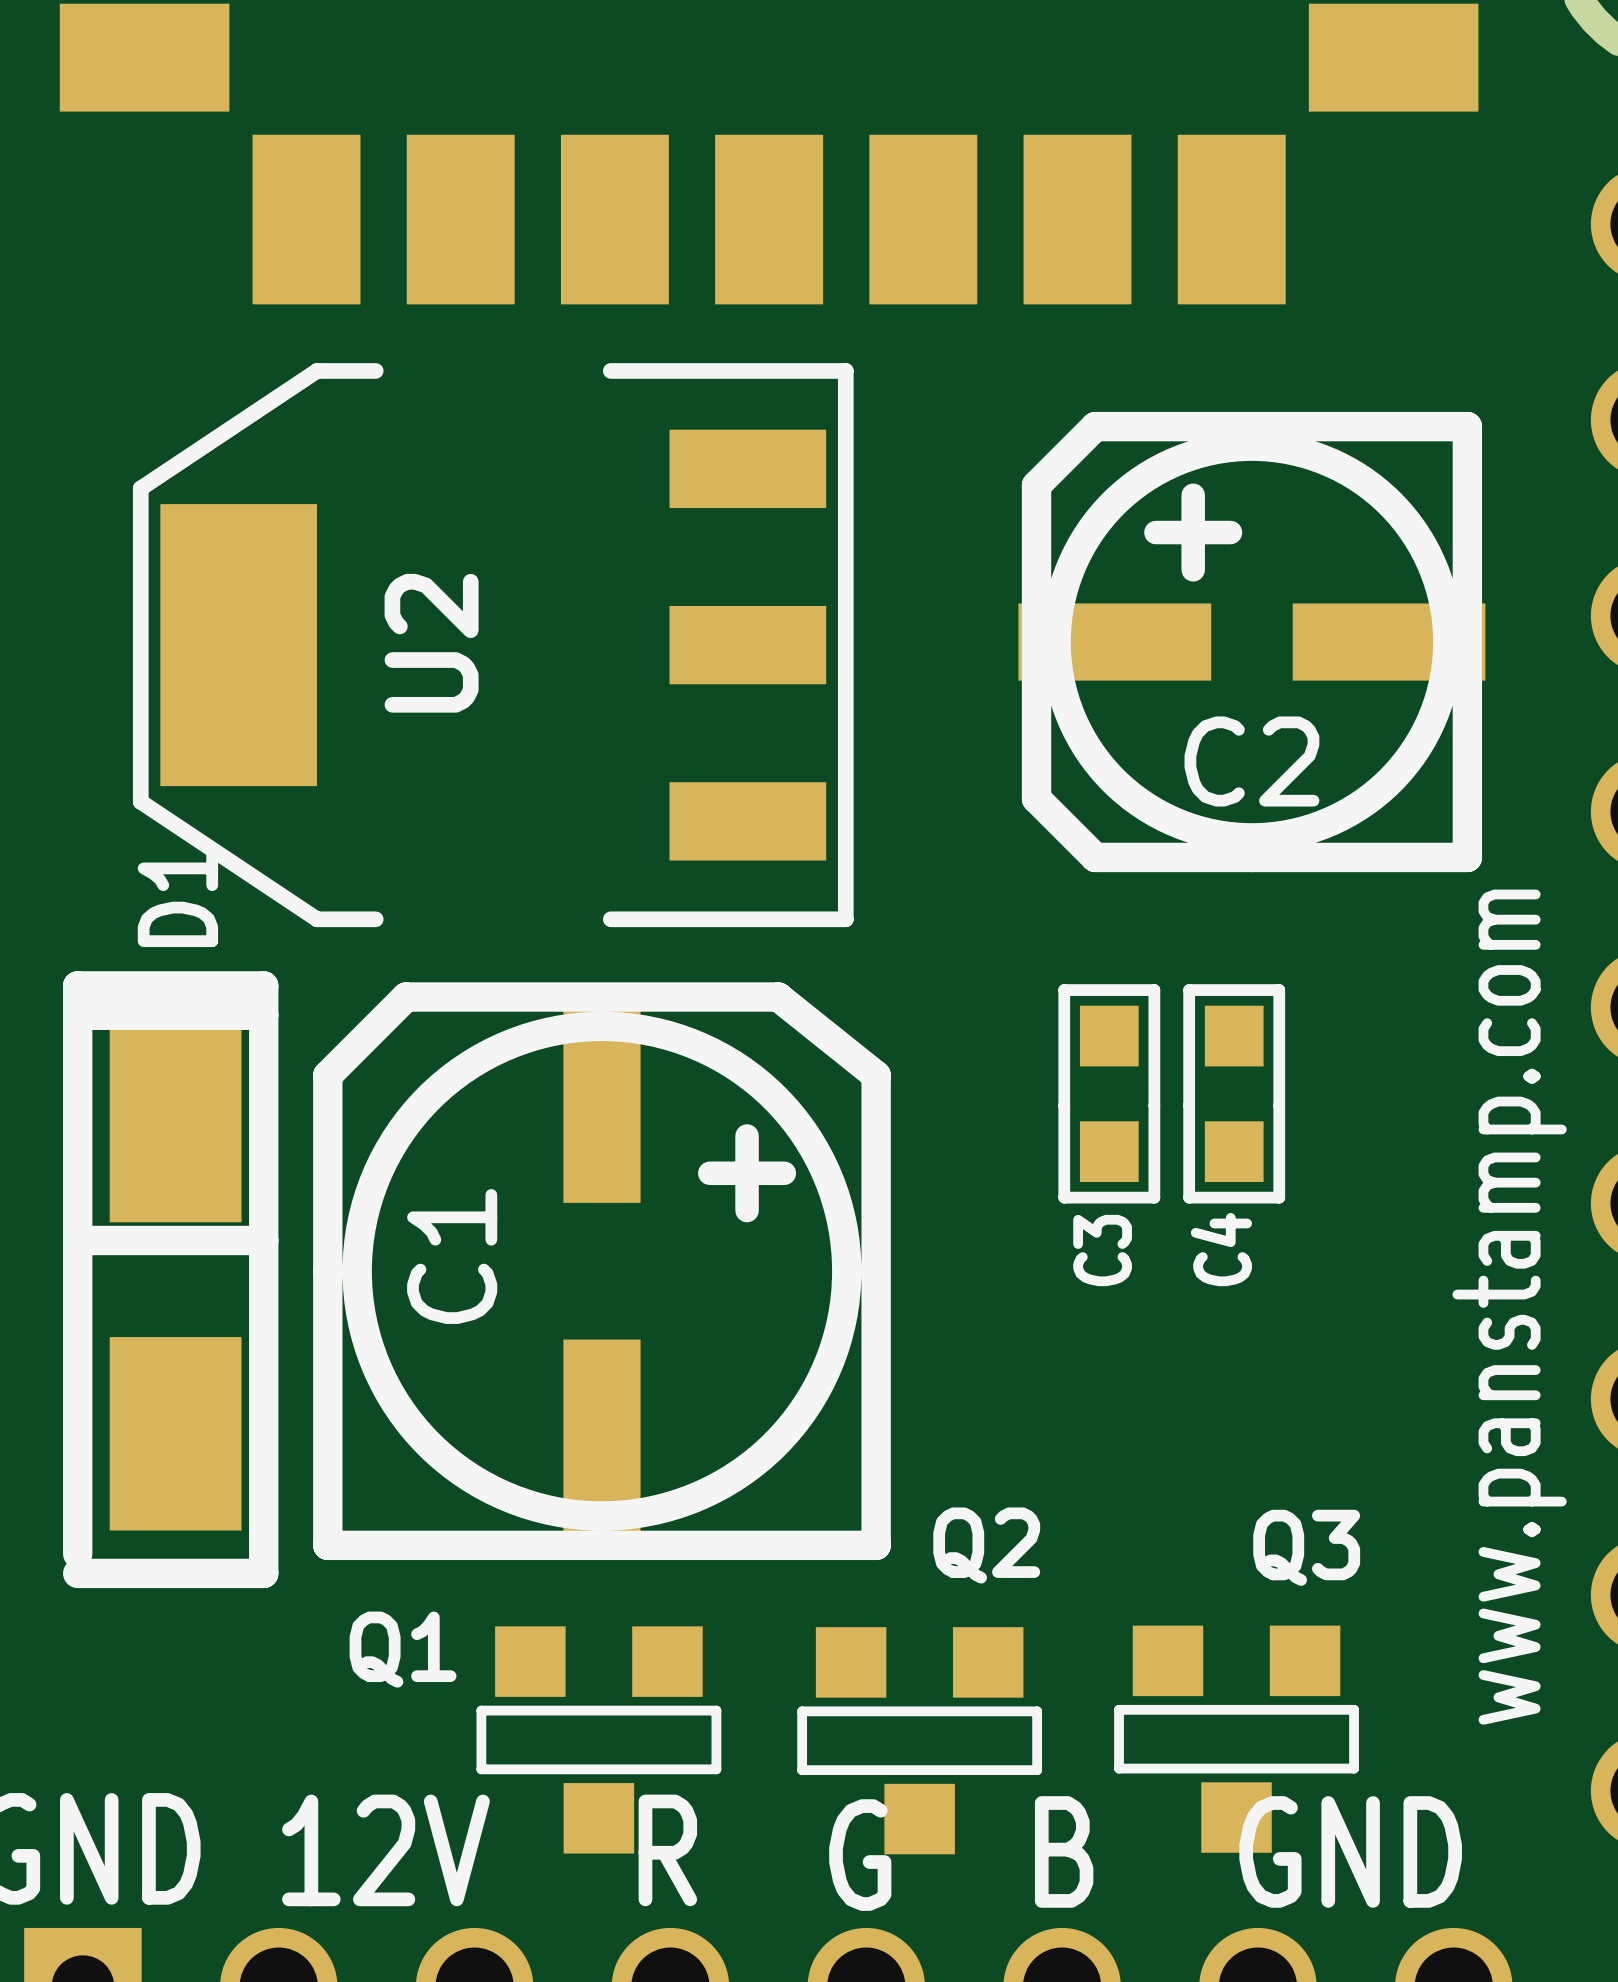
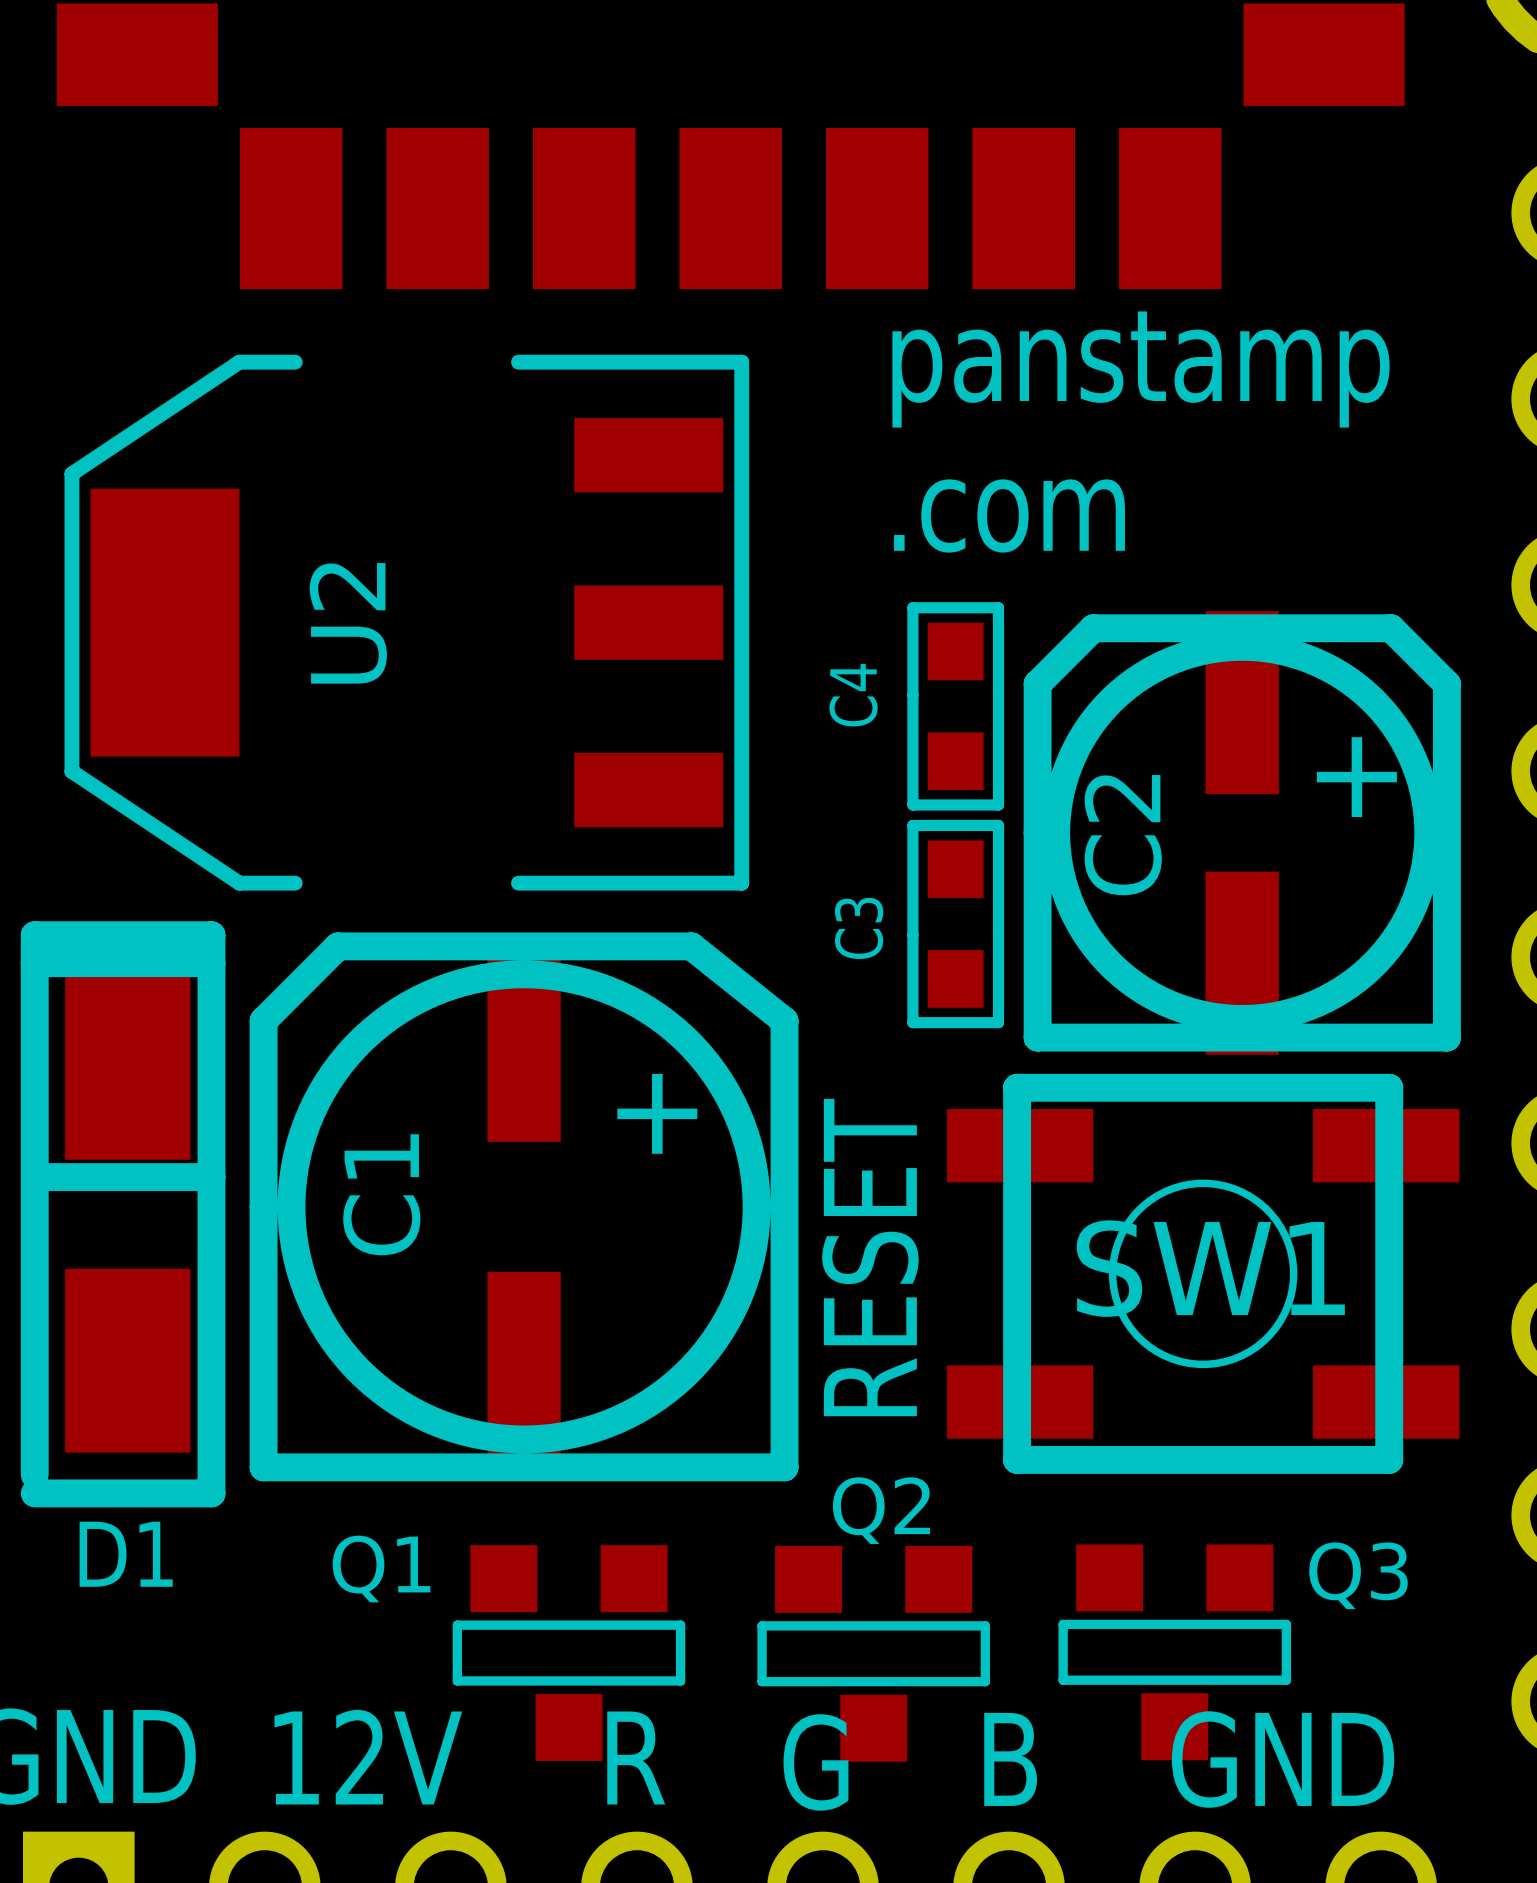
text: none -> panstamp (1141, 369)
text: none -> .com (1009, 515)
C2 rotation: 0° (1251, 642) -> 90° clockwise (1242, 832)
U2 position: (493, 645) -> (406, 622)
D1 name rotation: 0° (177, 896) -> 90° clockwise (126, 1554)
D1 name position: D1 (177, 896) -> D1 (126, 1554)
C3 position: (1109, 1093) -> (955, 924)
C4 rotation: 0° (1234, 1093) -> 180° (955, 706)
C4 position: (1234, 1093) -> (955, 706)
C4 name position: C4 (1221, 1249) -> C4 (853, 695)
C3 name position: C3 (1102, 1250) -> C3 (859, 928)
C1 position: (601, 1271) -> (524, 1206)
D1 position: (170, 1279) -> (123, 1214)
text: www.panstamp.com (1509, 1307) -> none
text: none -> RESET (870, 1257)
SW1: none -> (1203, 1273)
Q2 name position: Q2 (986, 1545) -> Q2 (881, 1510)
Q3 name position: Q3 (1306, 1547) -> Q3 (1358, 1575)

